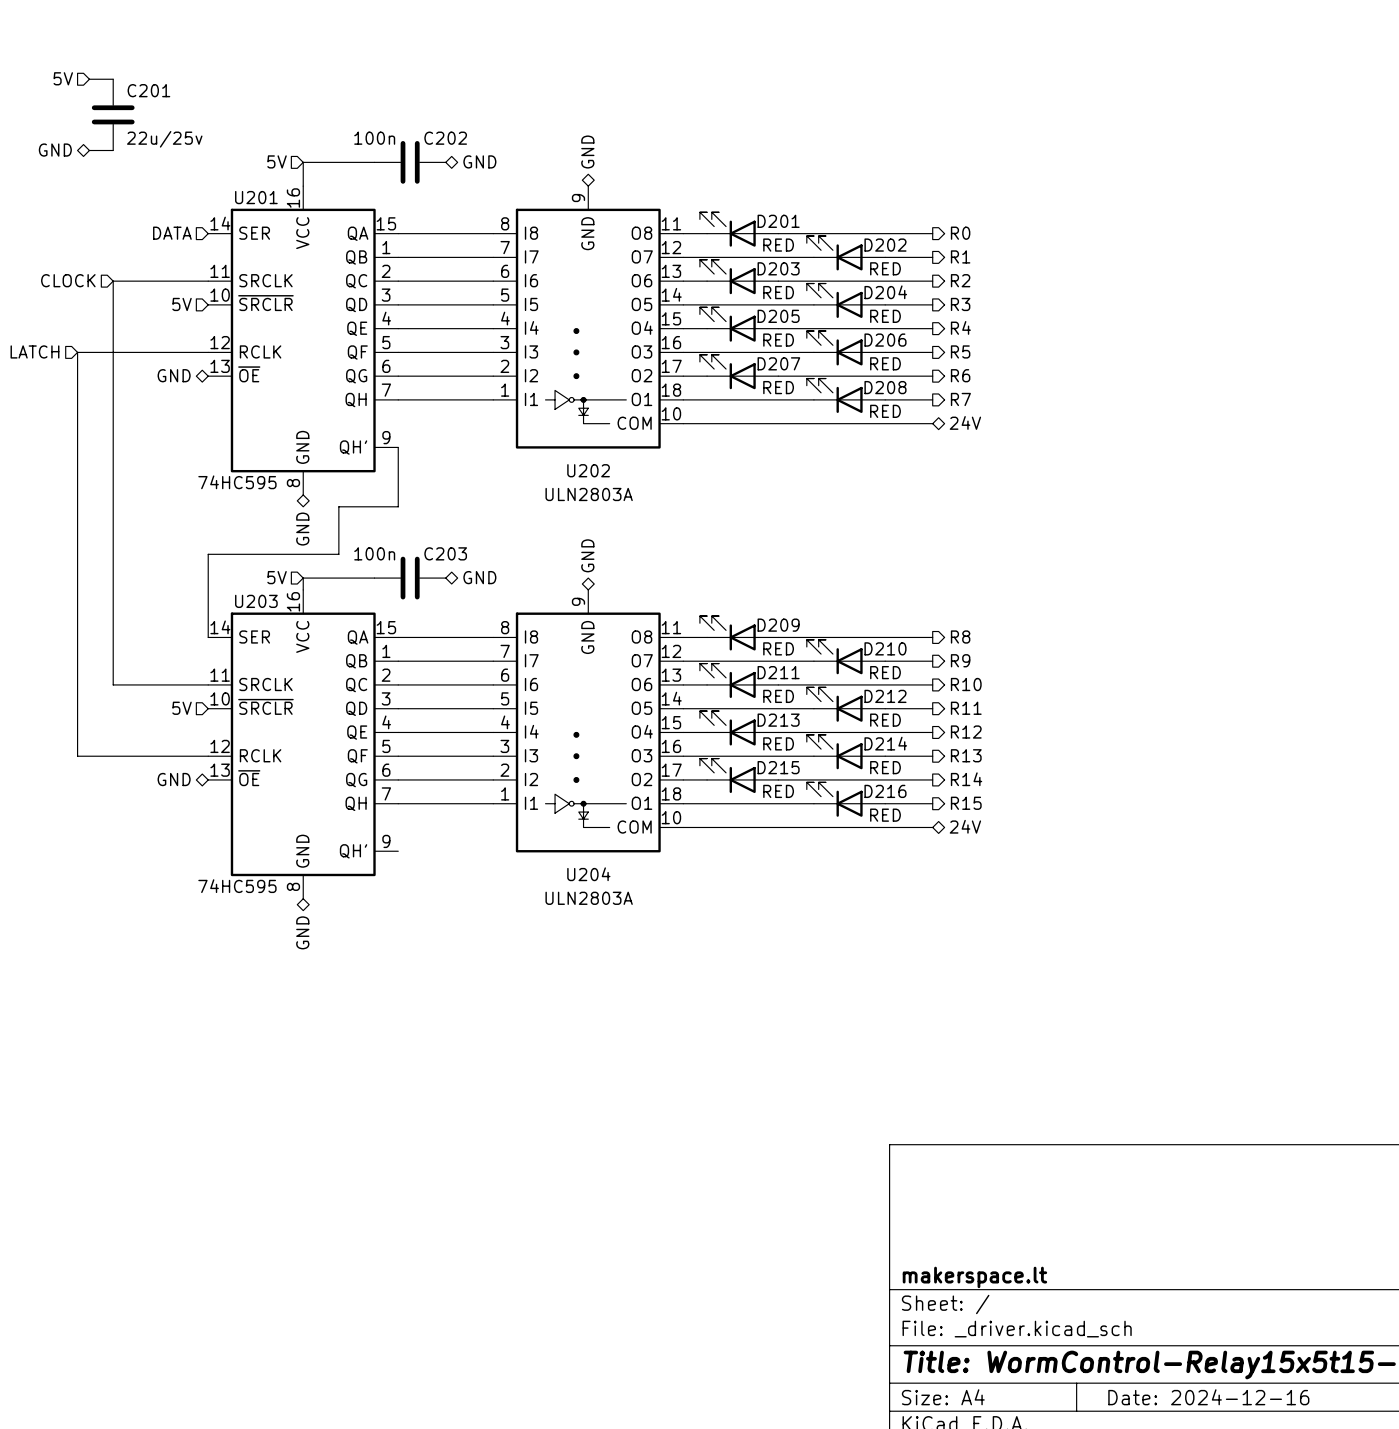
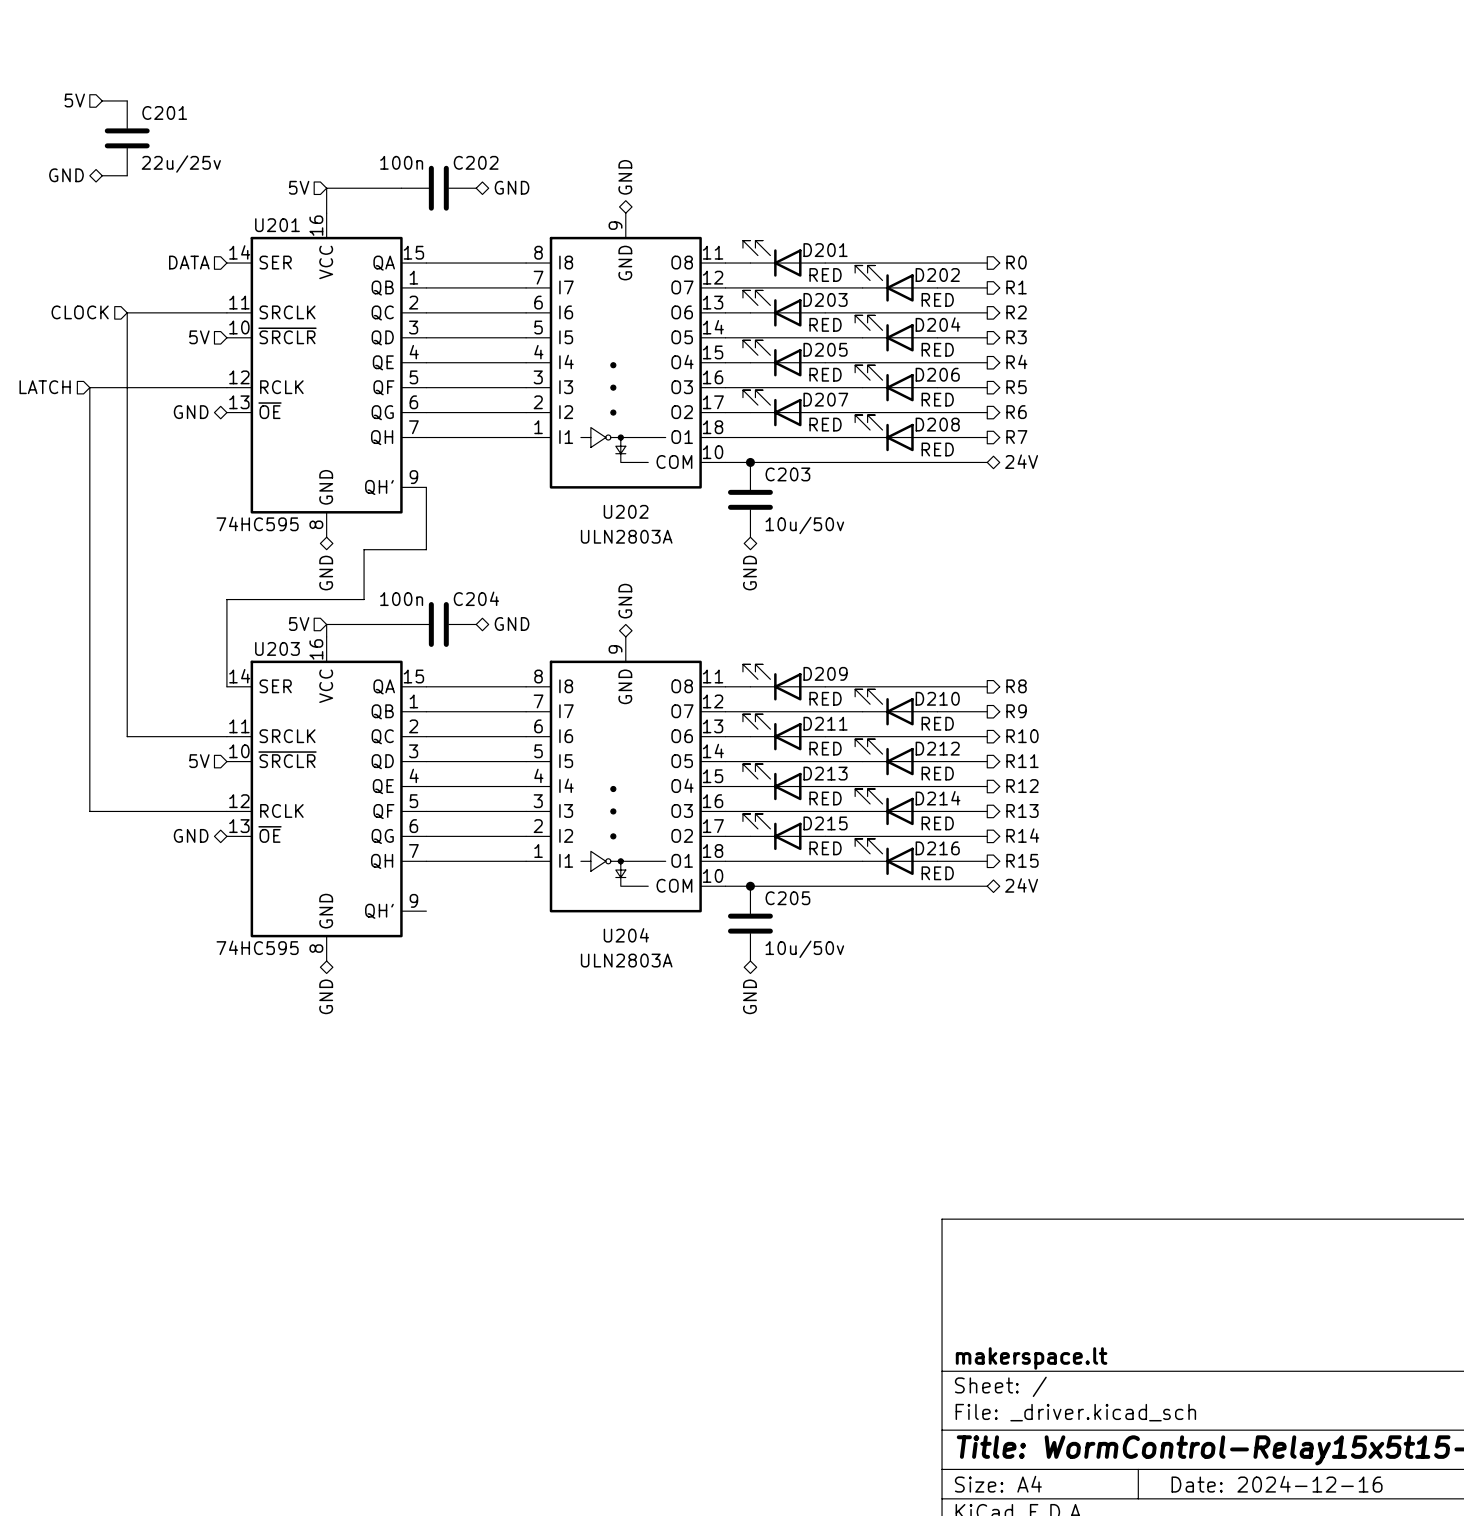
junction: none -> (750, 462)
C203: none -> 10u/50v (750, 499)
hierarchical label: none -> GND (749, 573)
C203 name: C203 (445, 553) -> C204 (476, 598)
junction: none -> (750, 886)
C205: none -> 10u/50v (750, 923)
hierarchical label: none -> GND (749, 996)

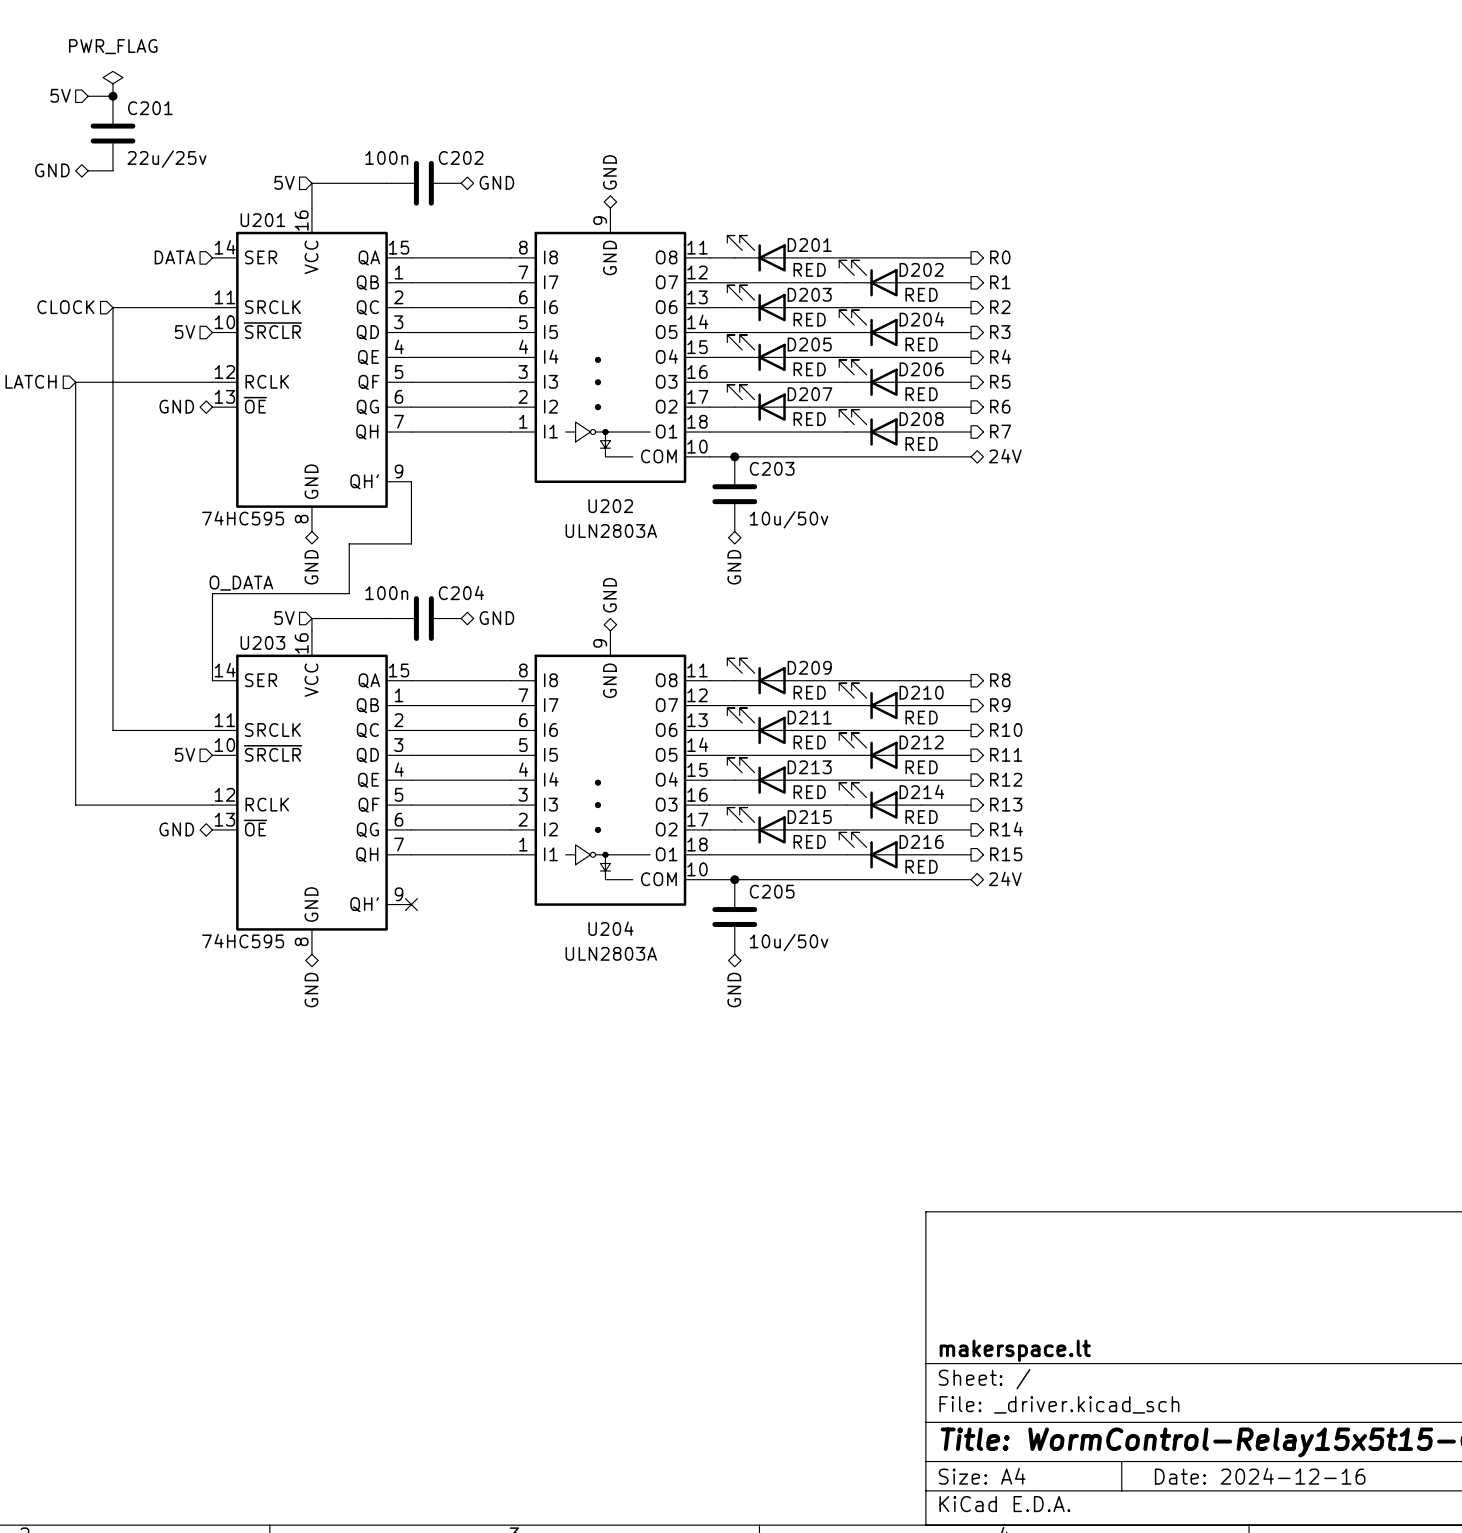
power symbol: none -> PWR_FLAG (112, 83)
junction: none -> (112, 96)
label: none -> O_DATA (241, 583)
no-connect mark: none -> (411, 904)

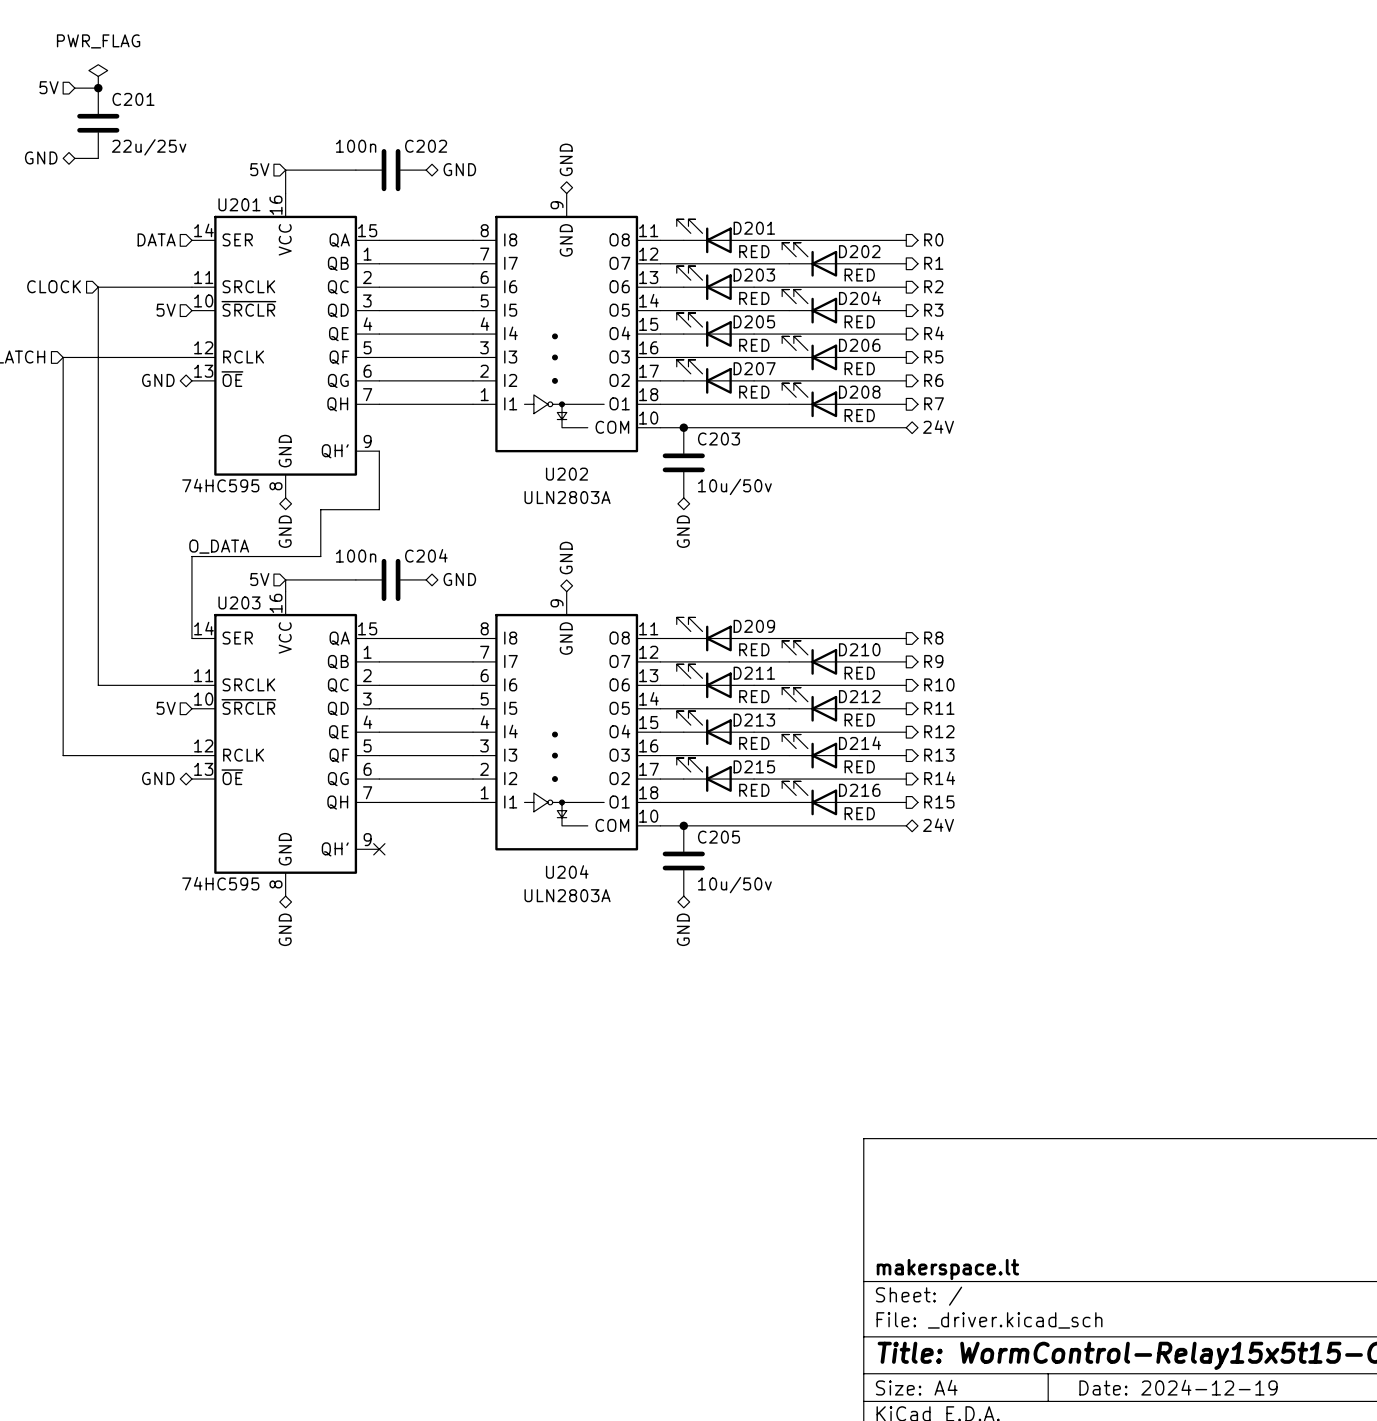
title block: Date: 2024-12-16 (1260, 1476) -> Date: 2024-12-19 (1178, 1387)

